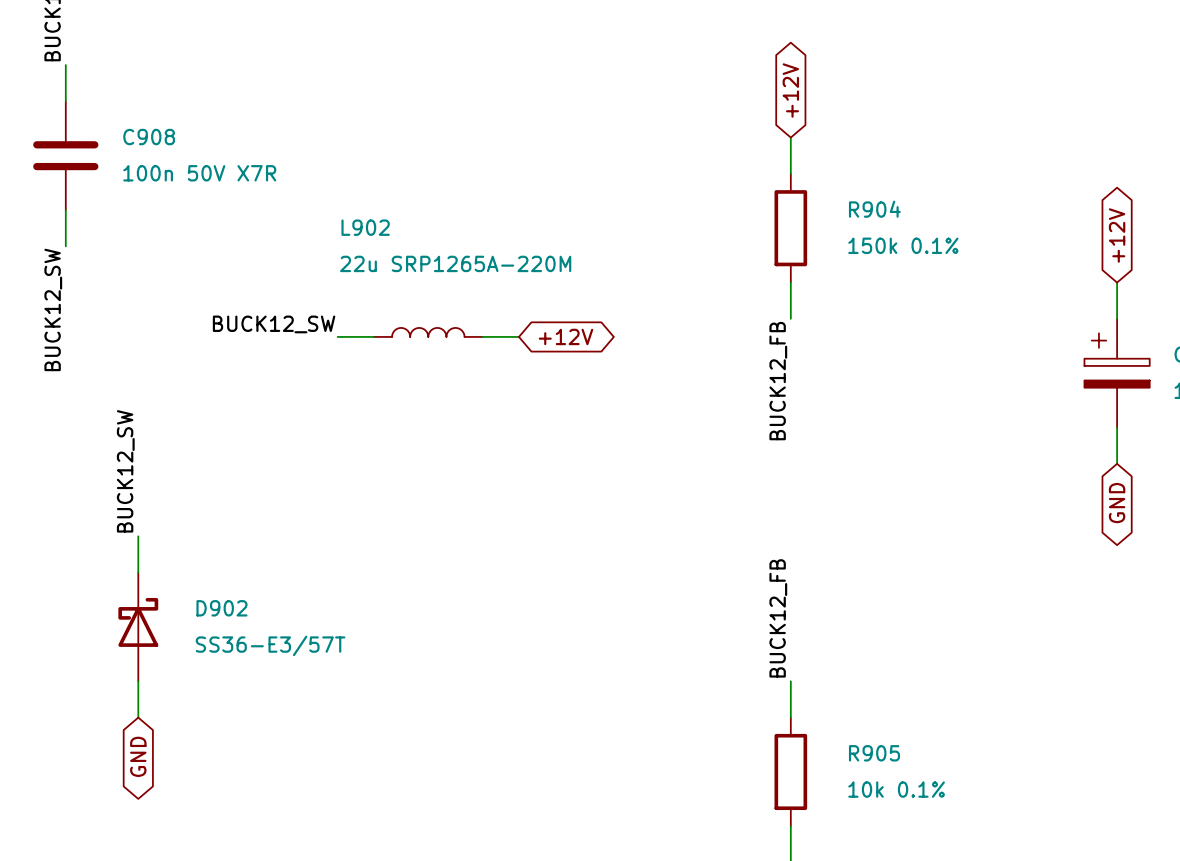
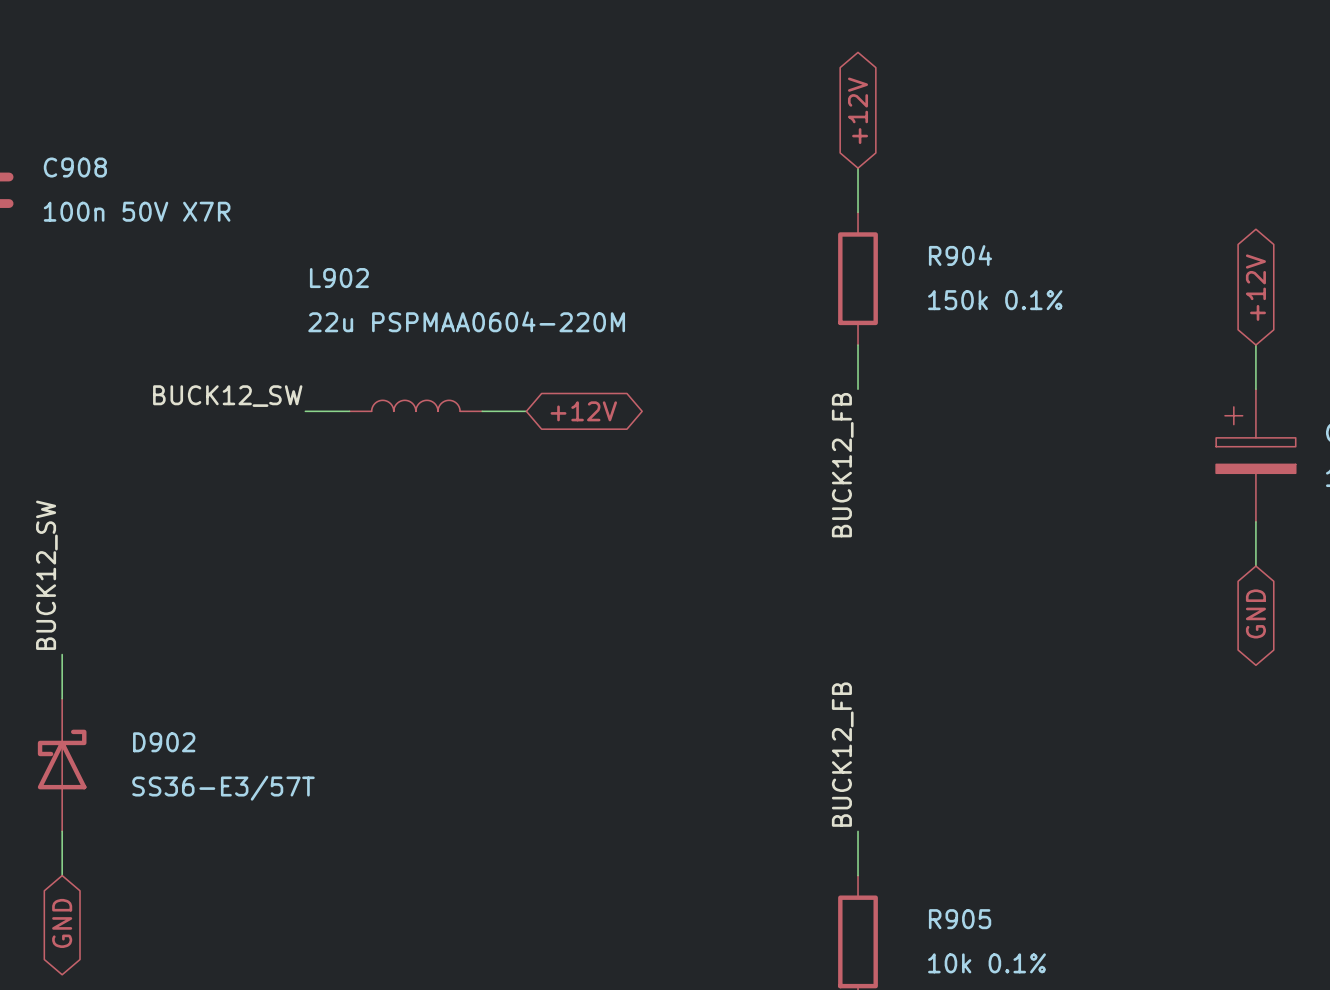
L902 value: 22u SRP1265A-220M (455, 263) -> 22u PSPMAA0604-220M (466, 321)

